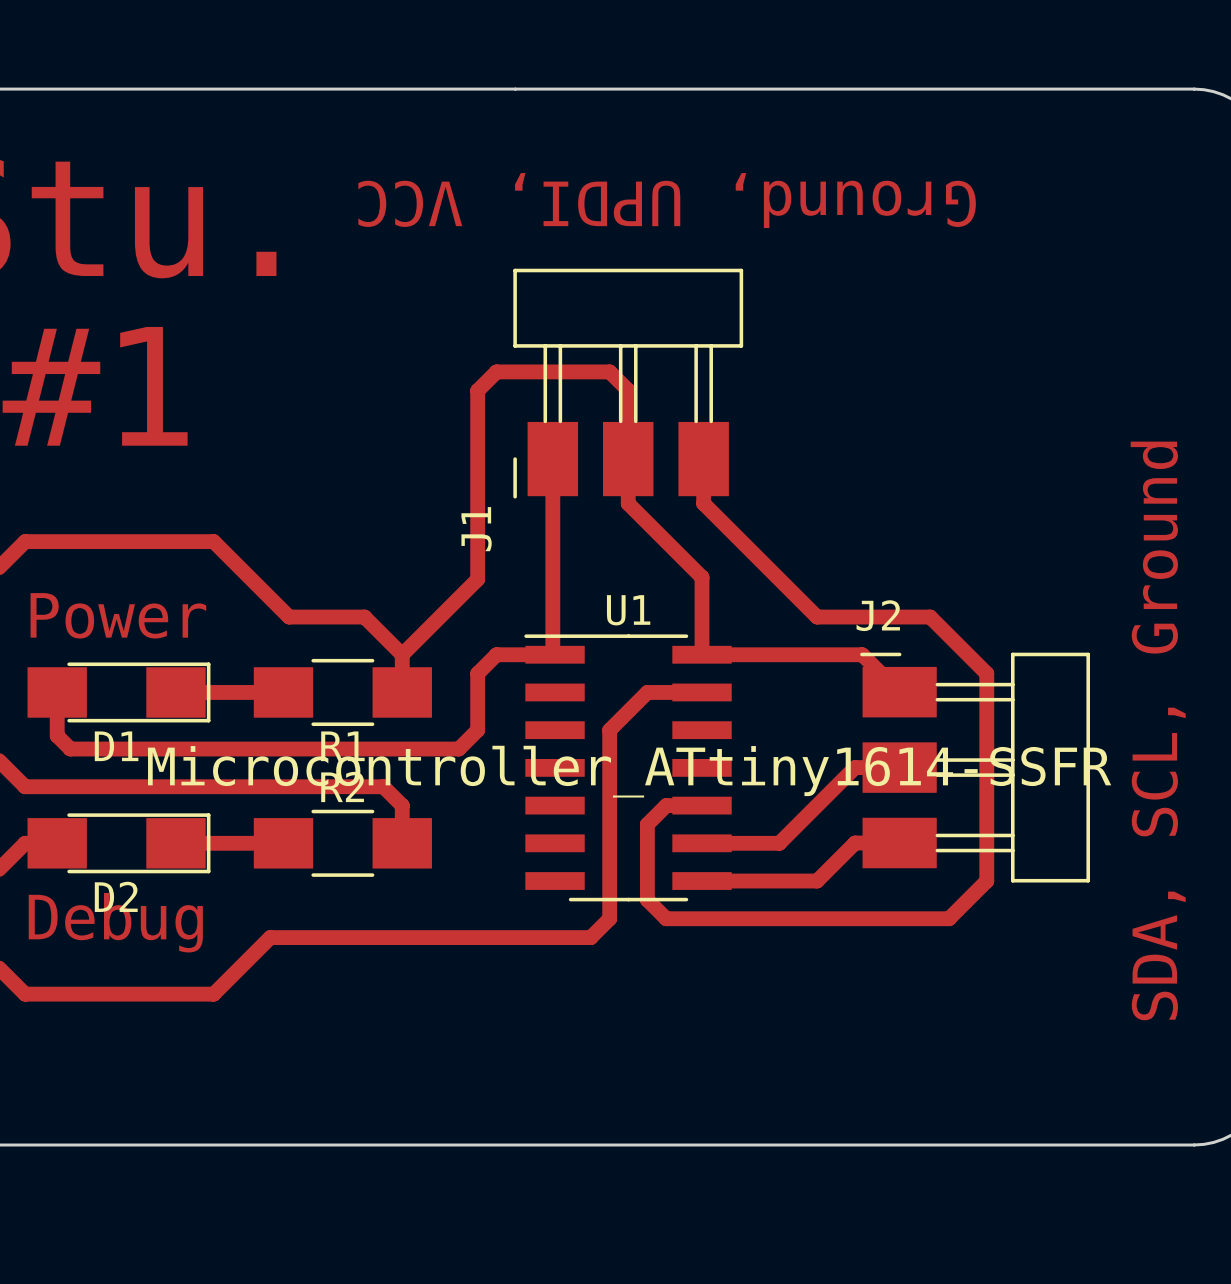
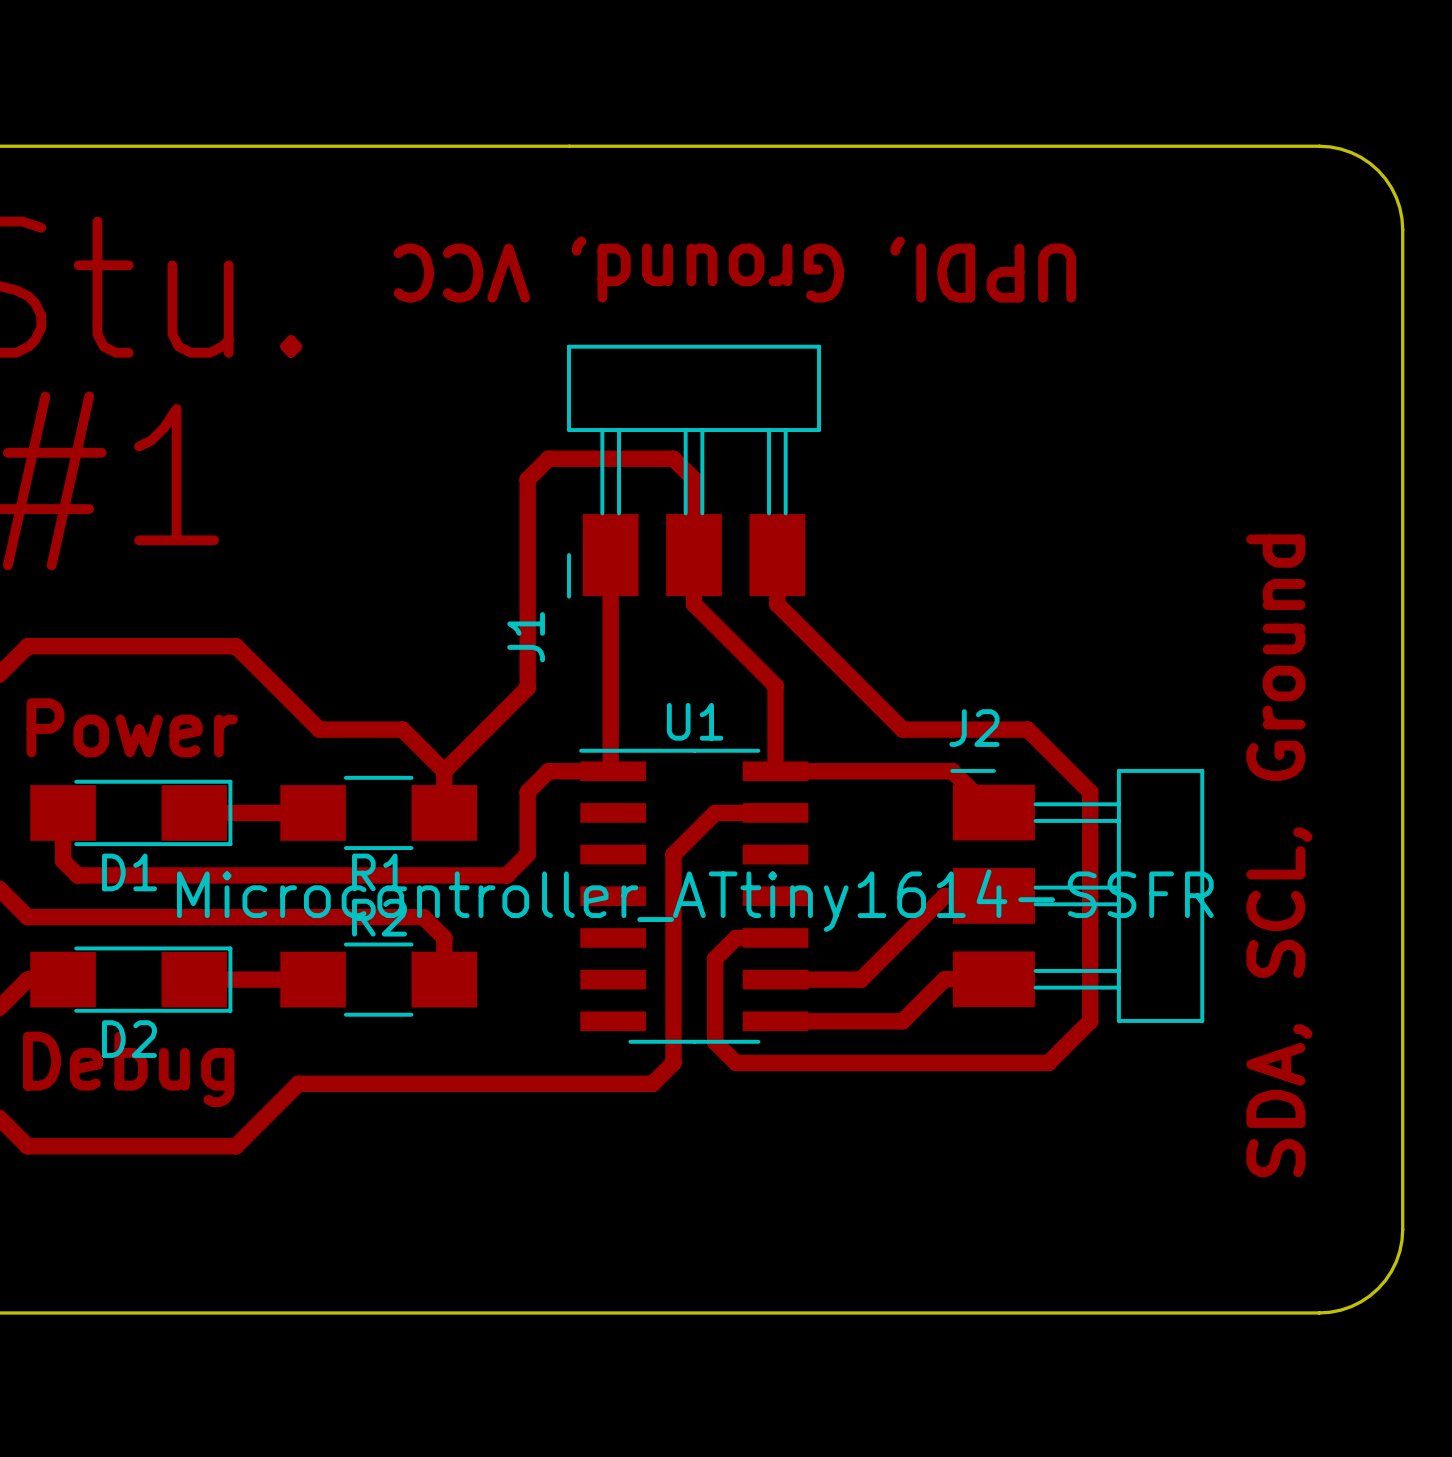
text: Ground, UPDI, VCC (667, 200) -> UPDI, Ground, VCC (734, 269)

